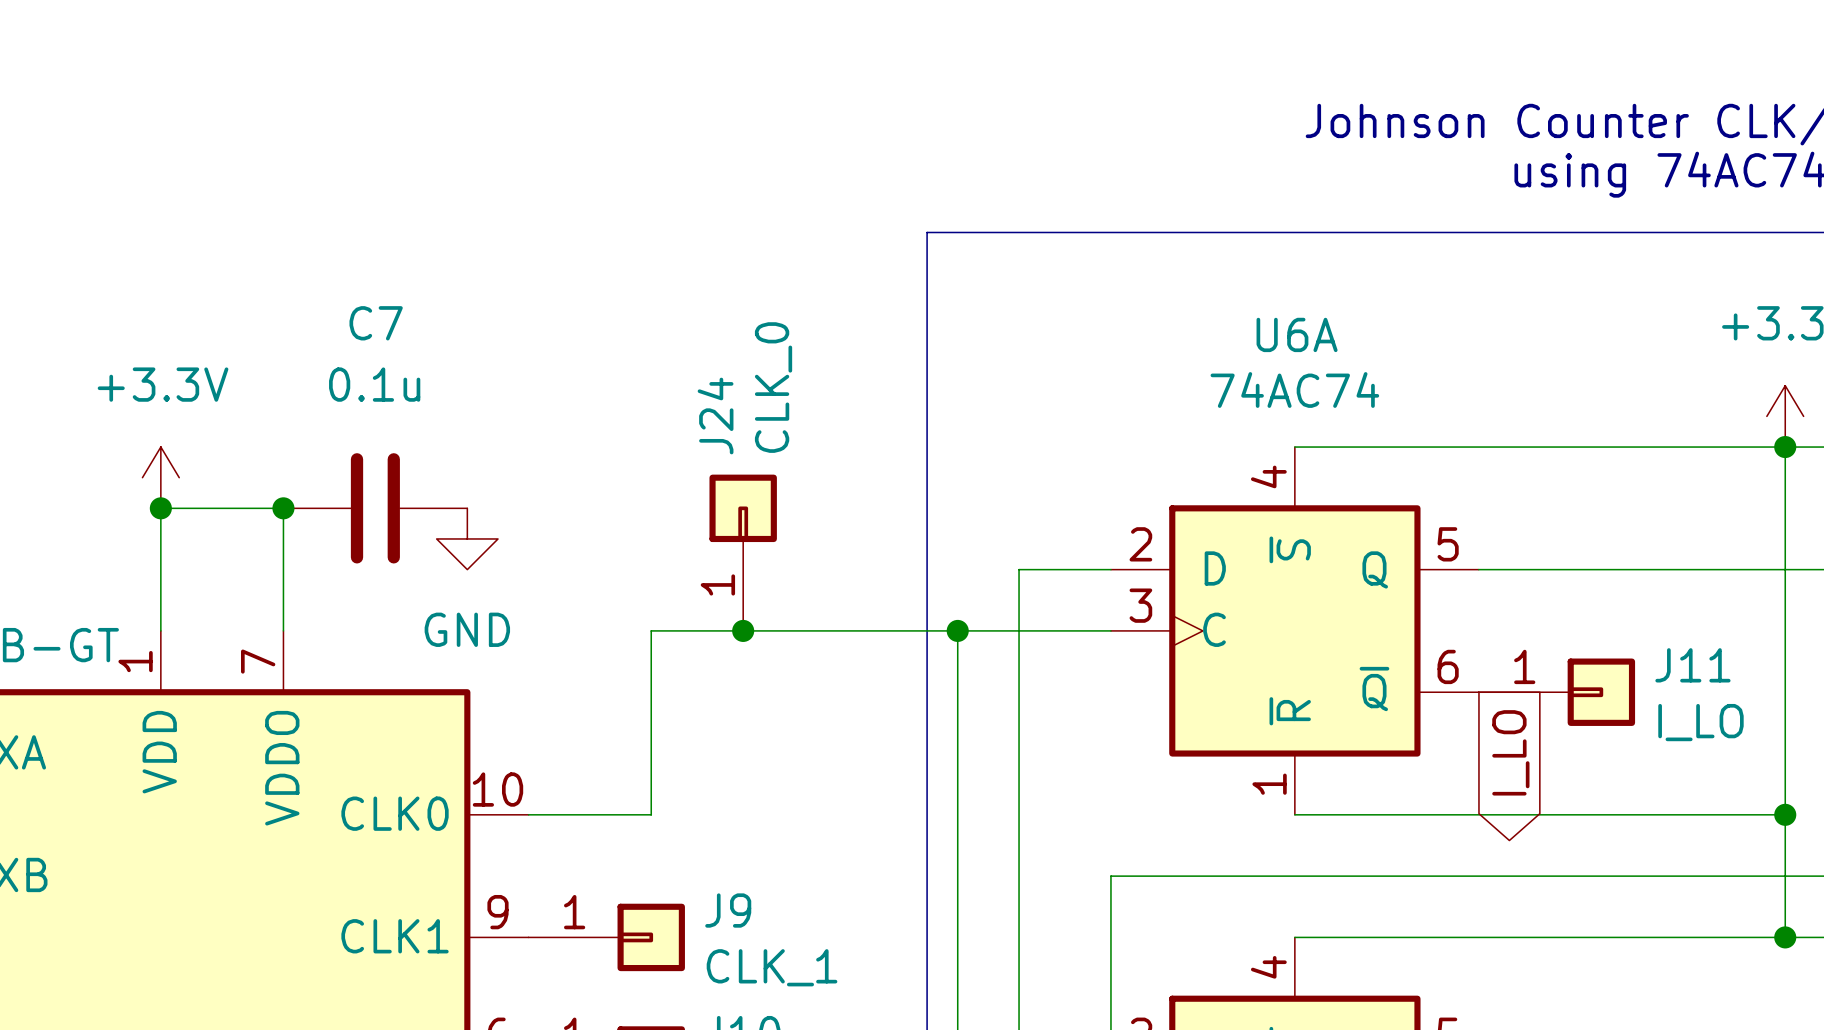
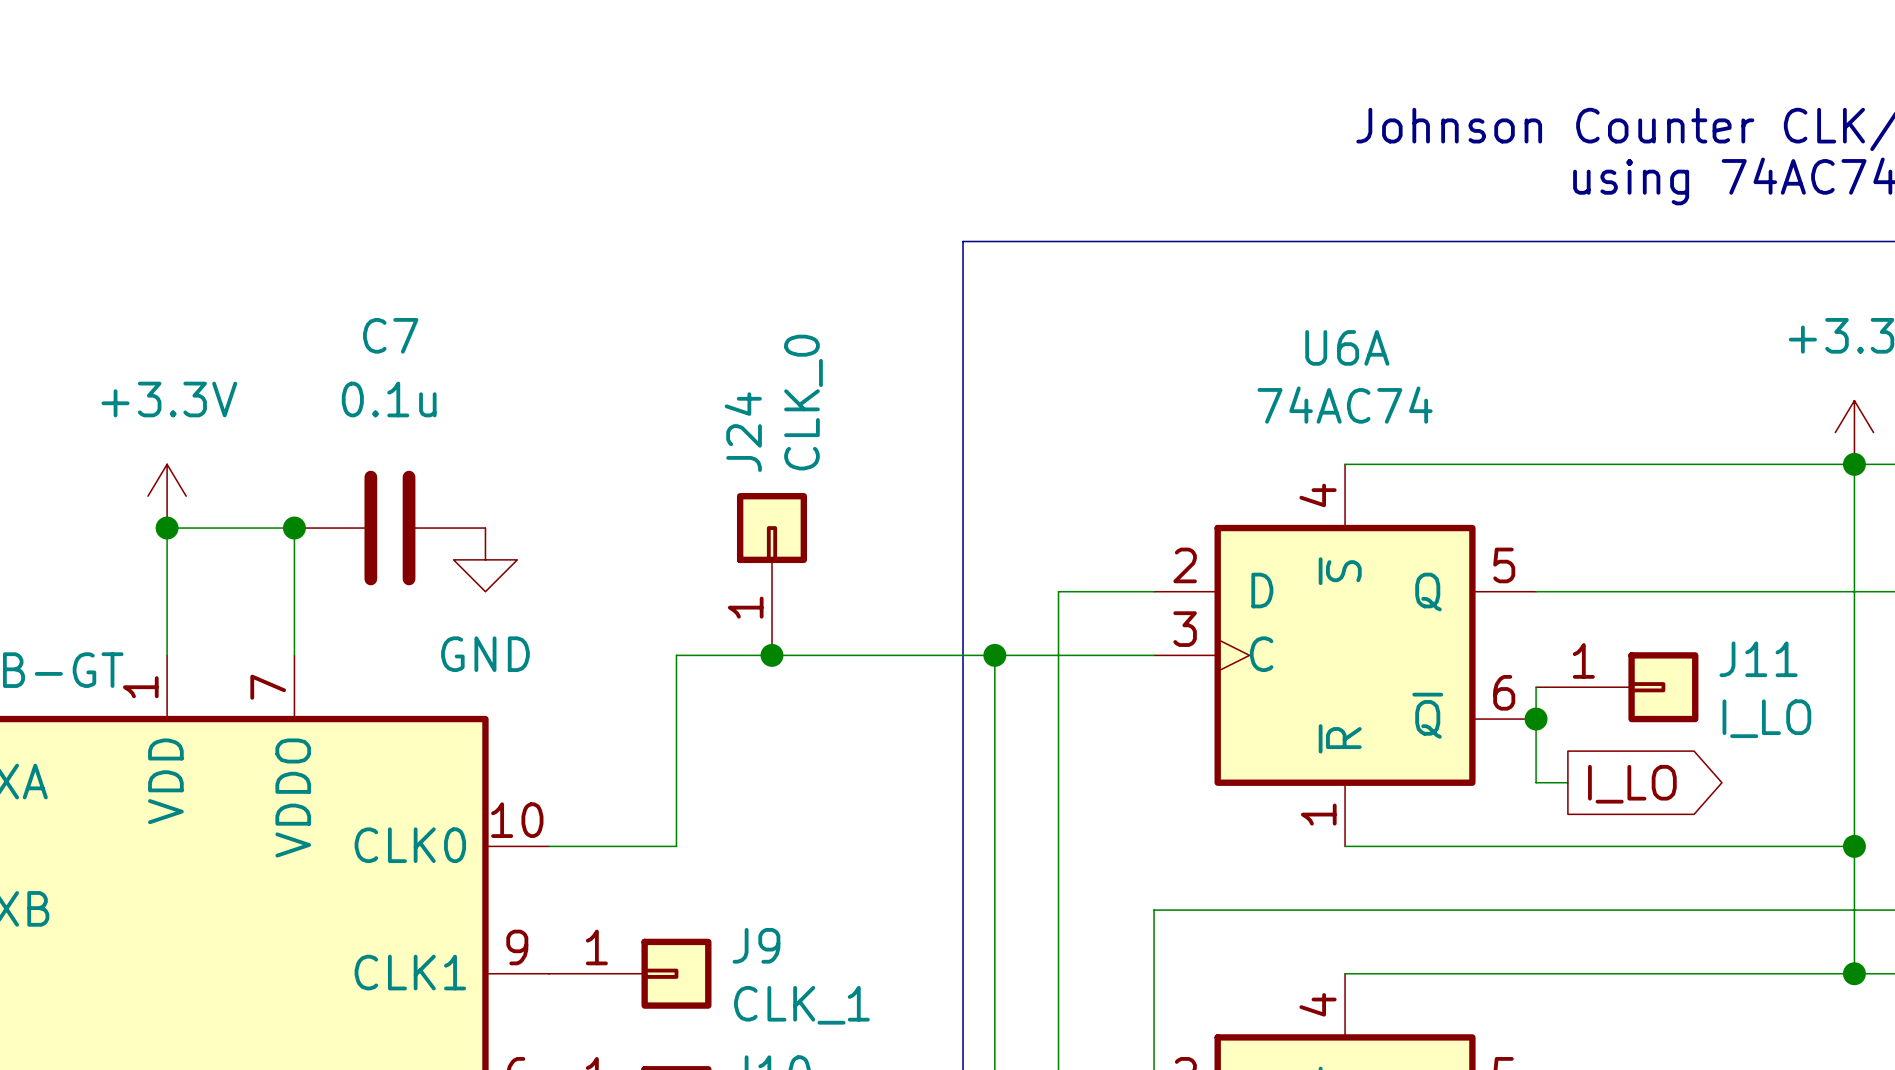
wire: none -> (1536, 687) (1536, 782) (1567, 782)
junction: none -> (1536, 719)
J11 position: (1556, 692) -> (1617, 687)
global label rotation: 0° (1510, 752) -> 90° counterclockwise (1632, 784)

